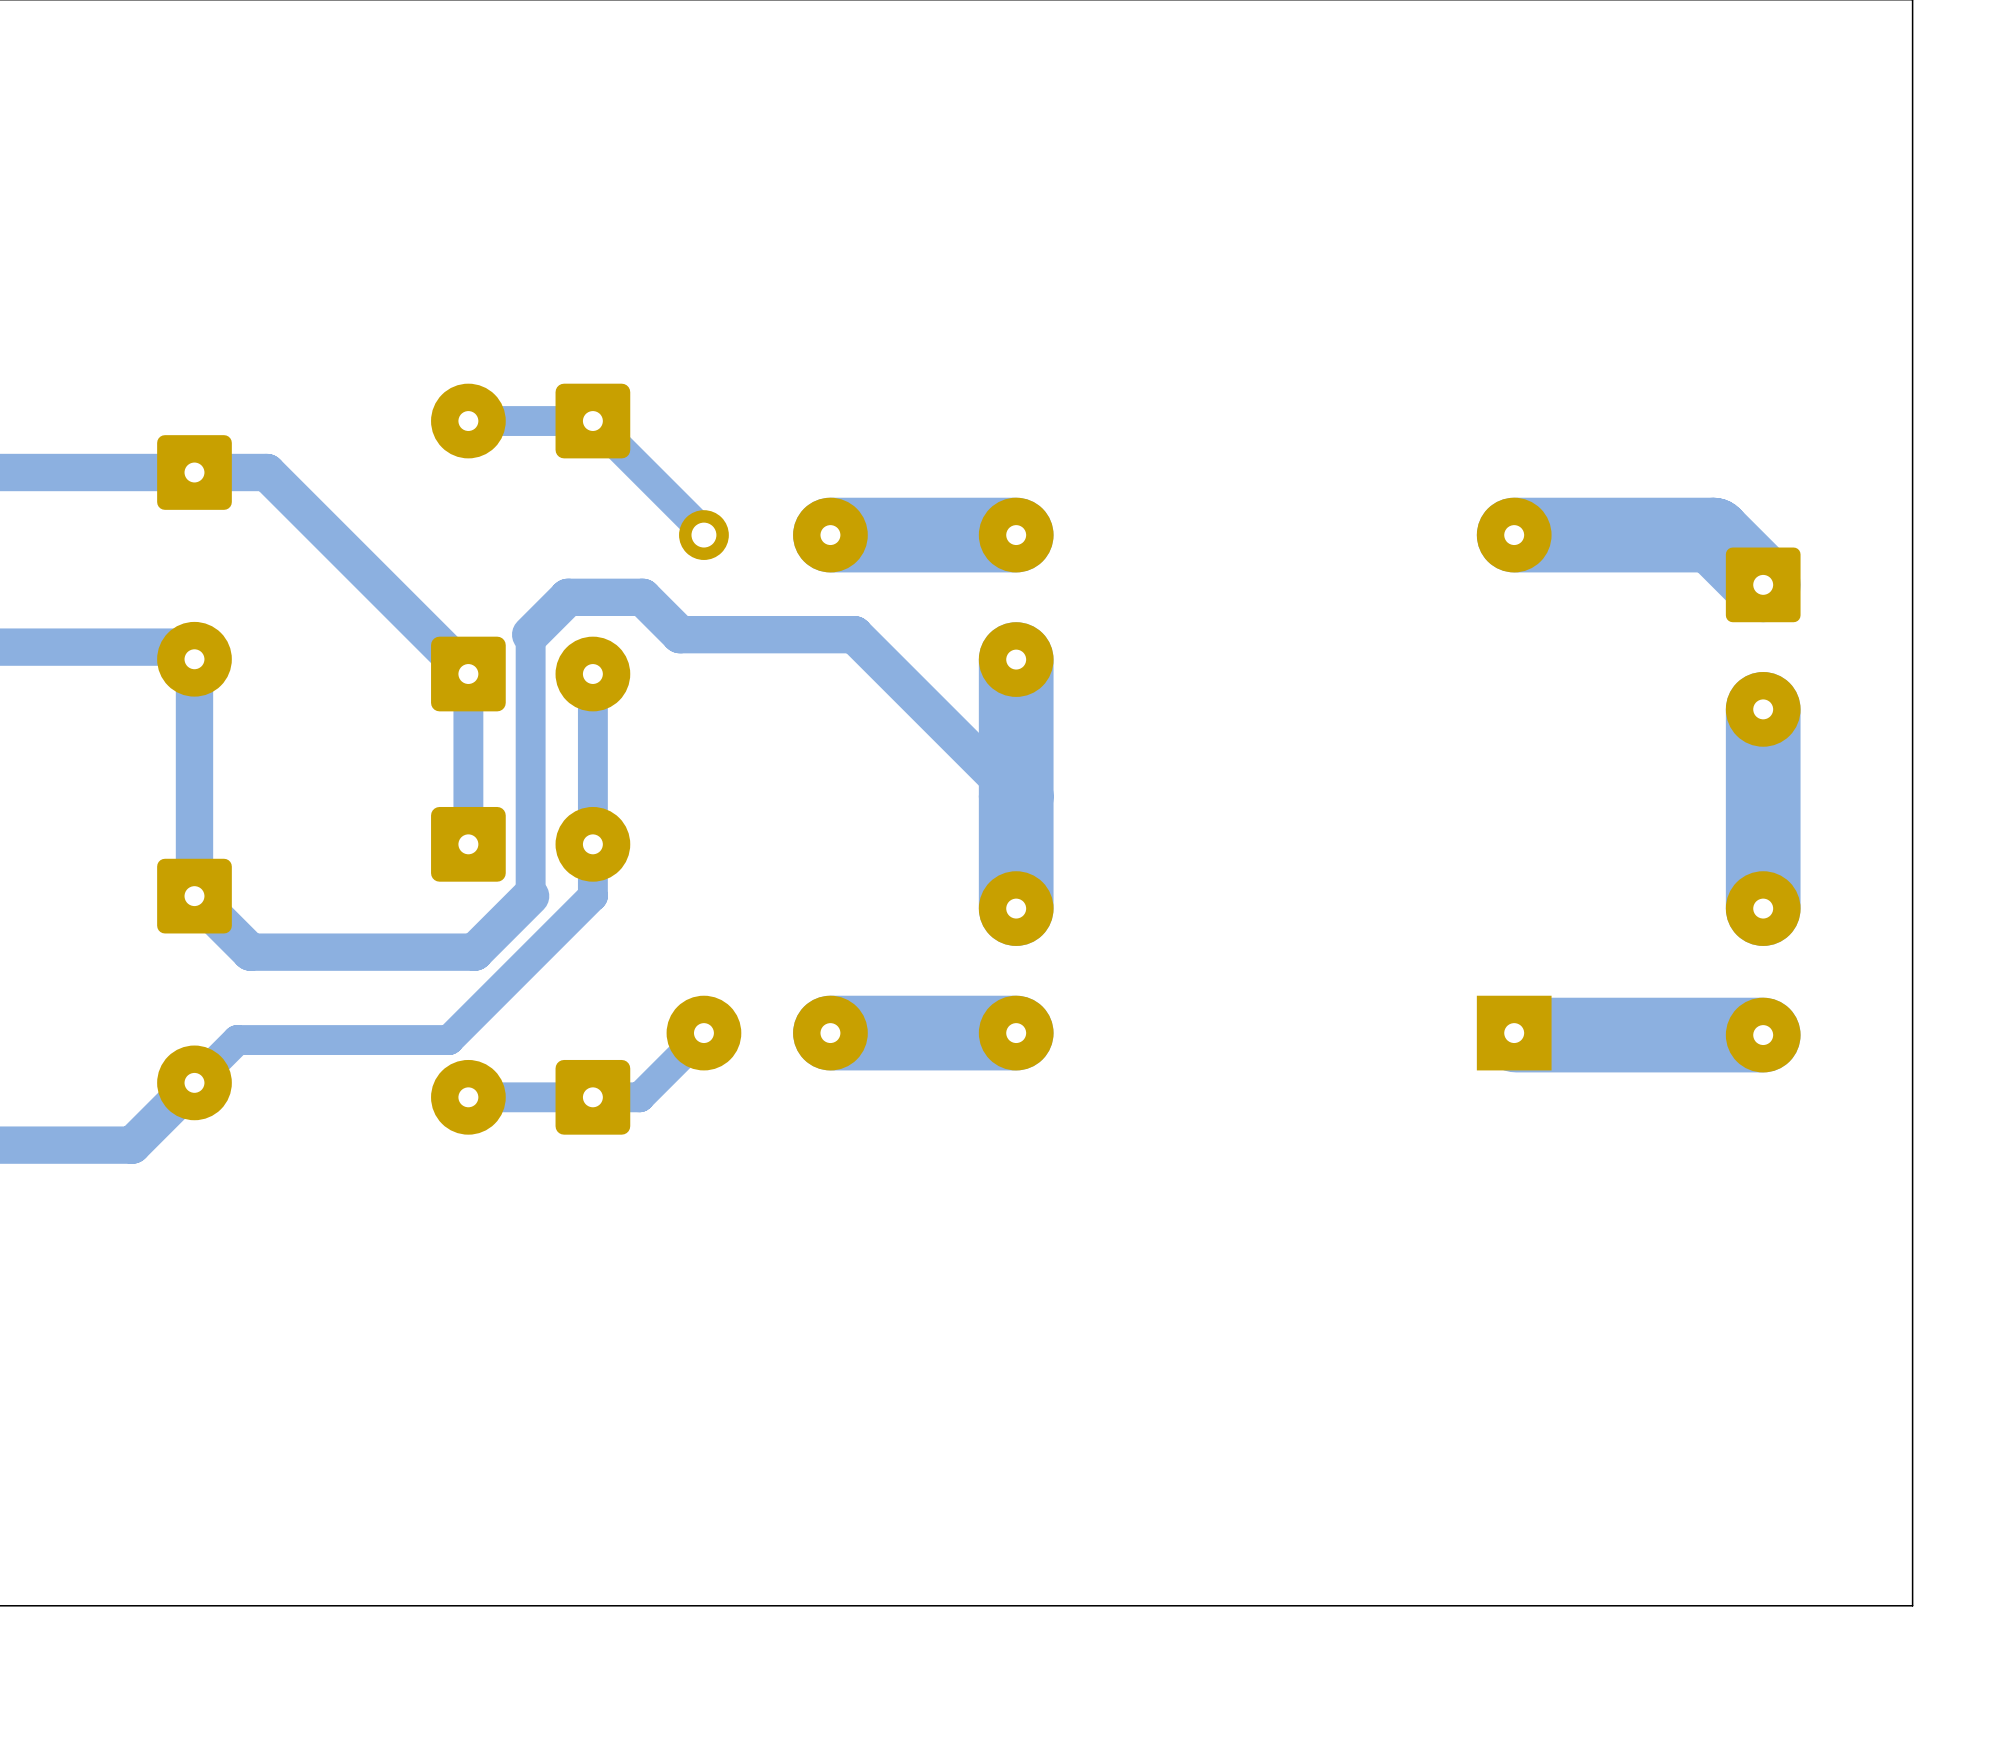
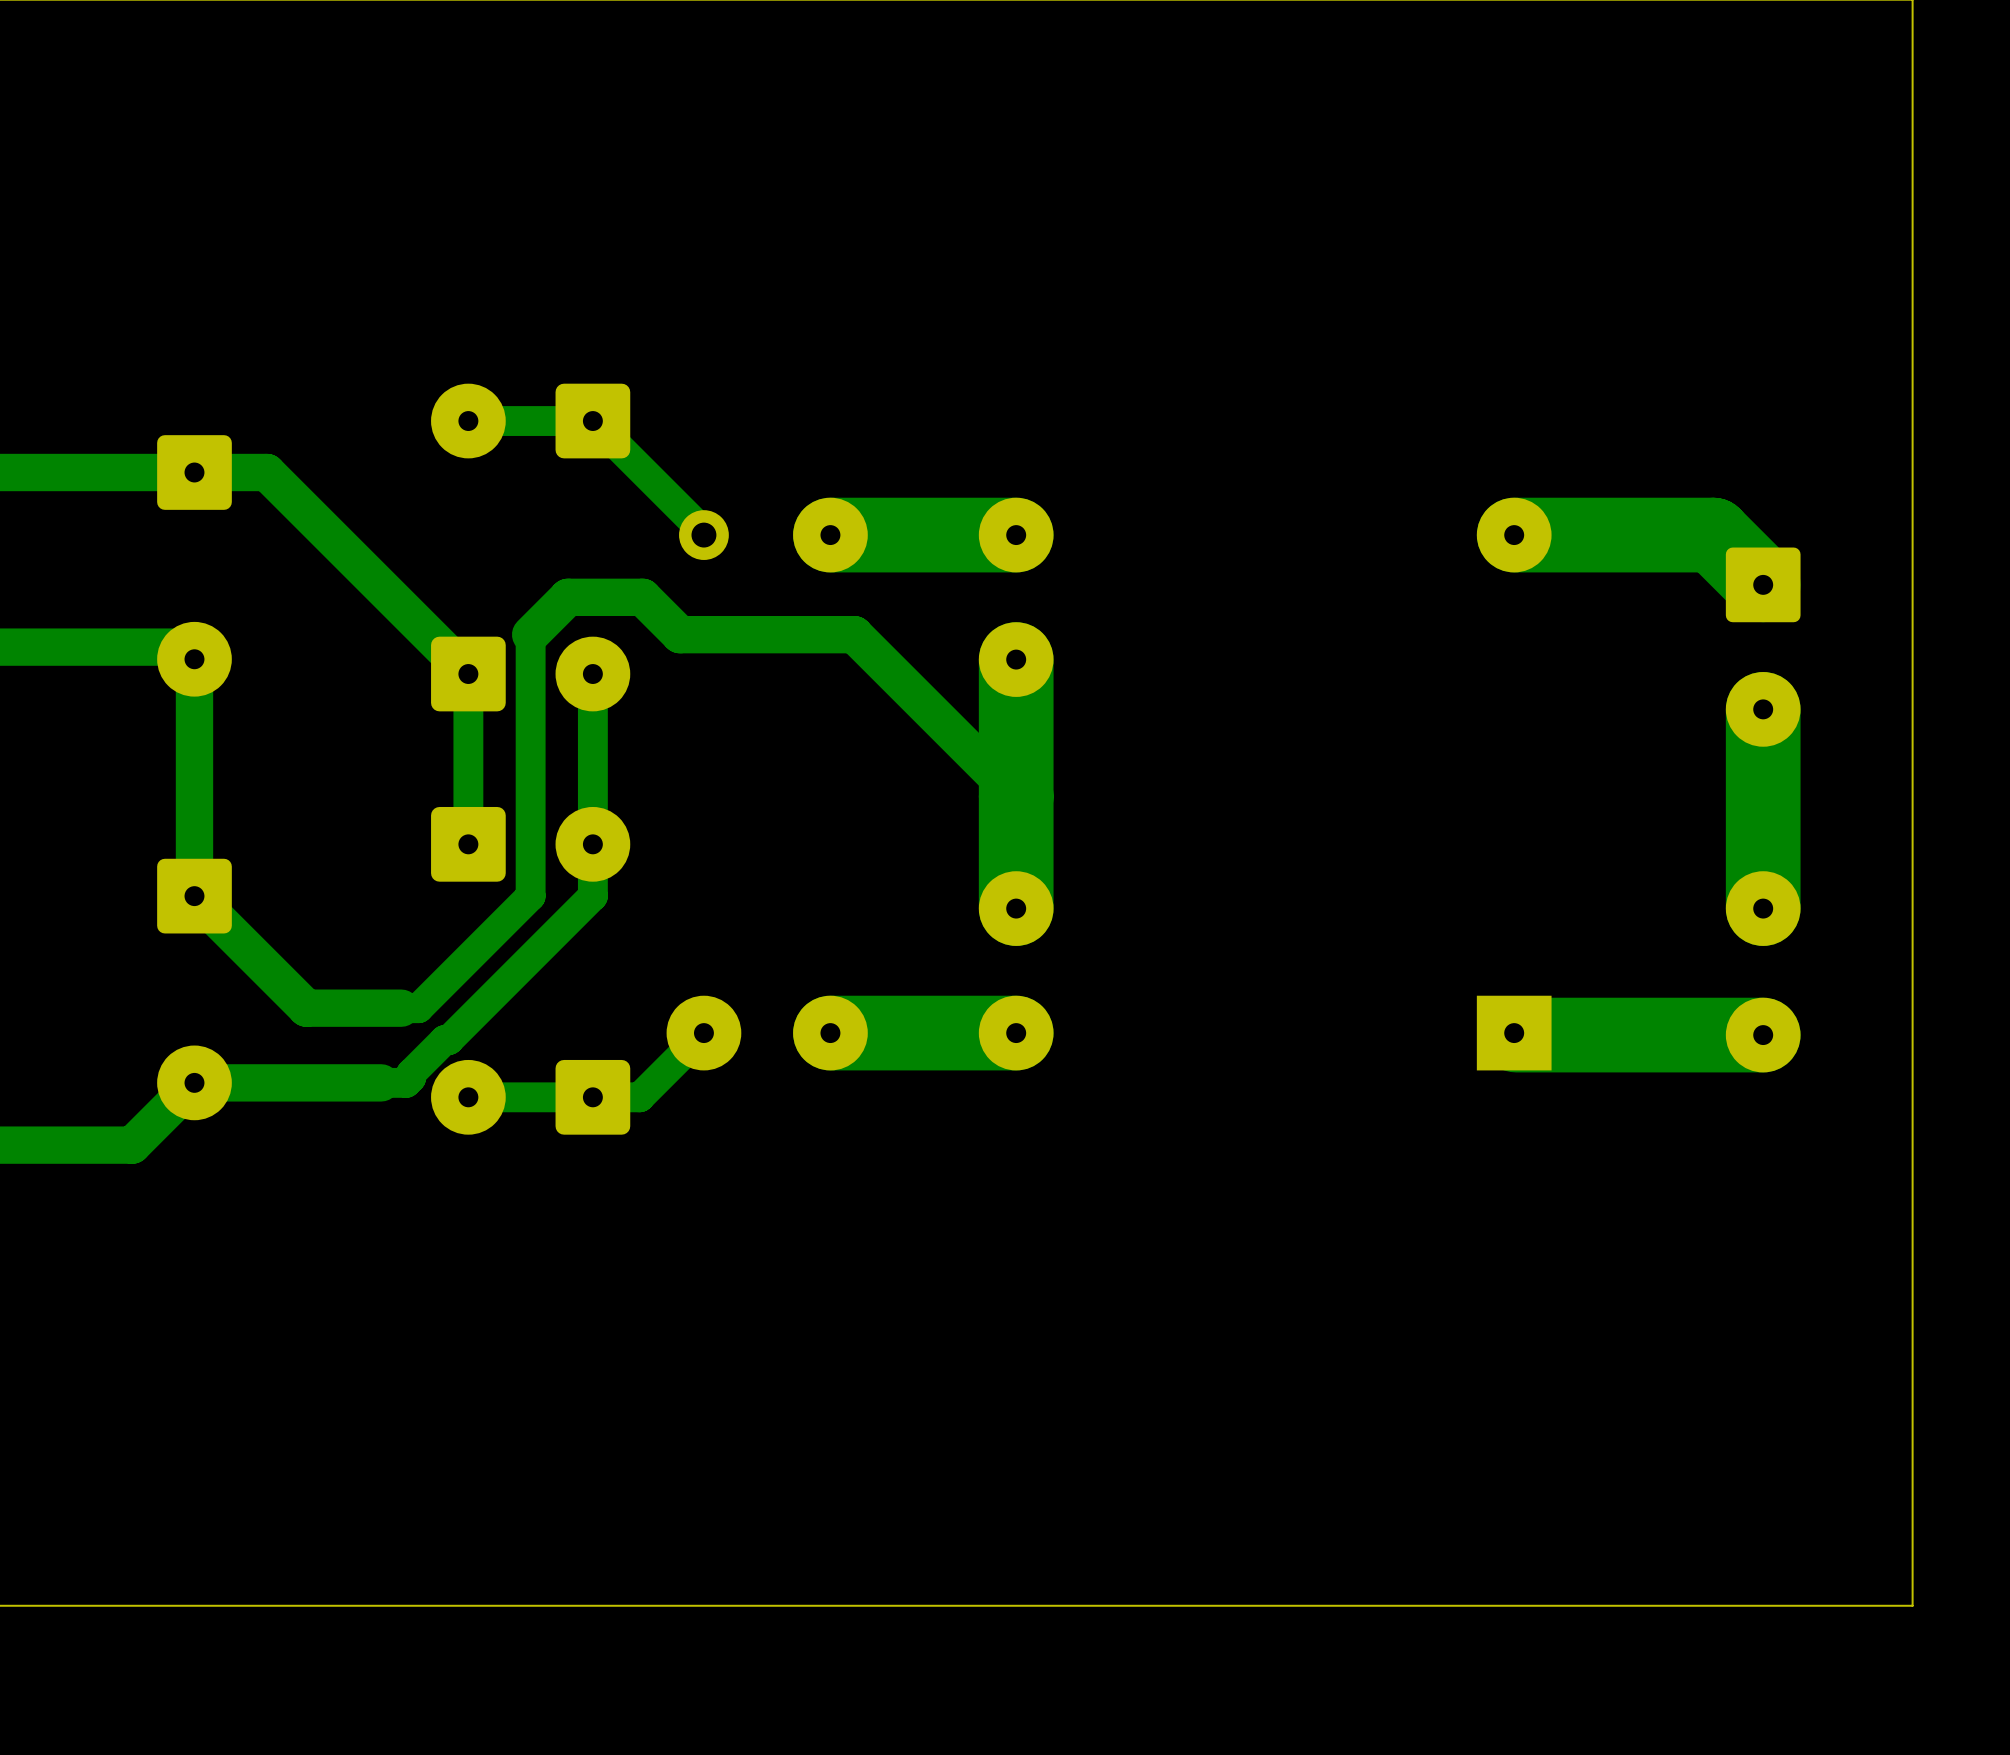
track width: thick (530, 896) (474, 952) -> thin (530, 896) (474, 952)
track: (474, 952) (250, 952) -> (474, 952) (418, 1008) (306, 1008) (250, 952)
track: (444, 1040) (237, 1040) (194, 1082) -> (444, 1040) (411, 1073) (411, 1077) (406, 1082) (194, 1082)

